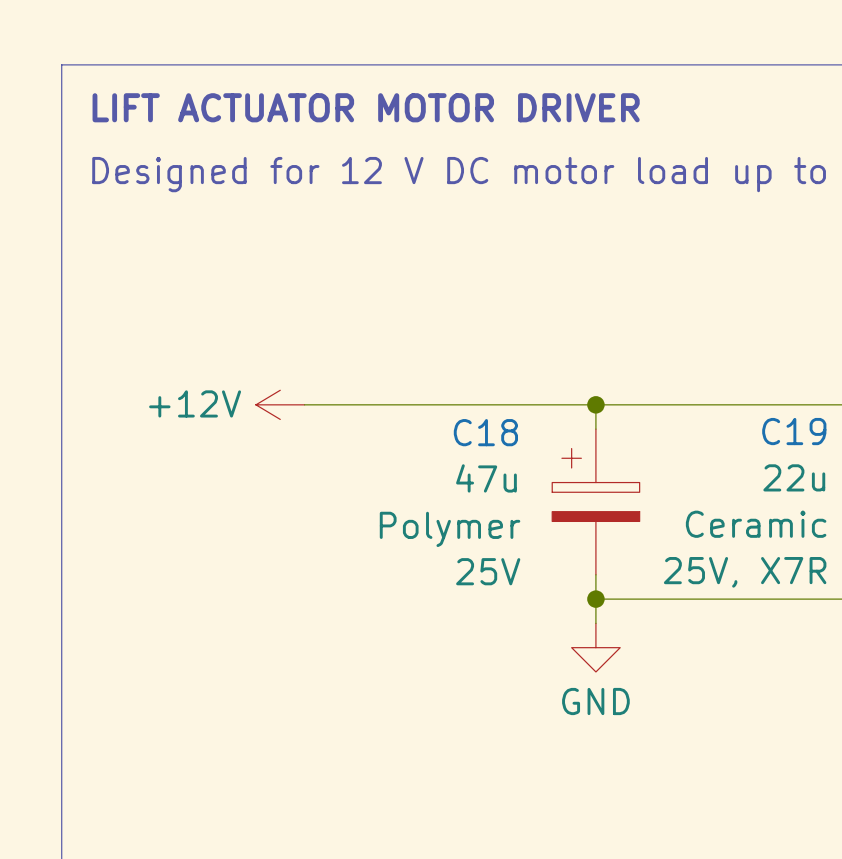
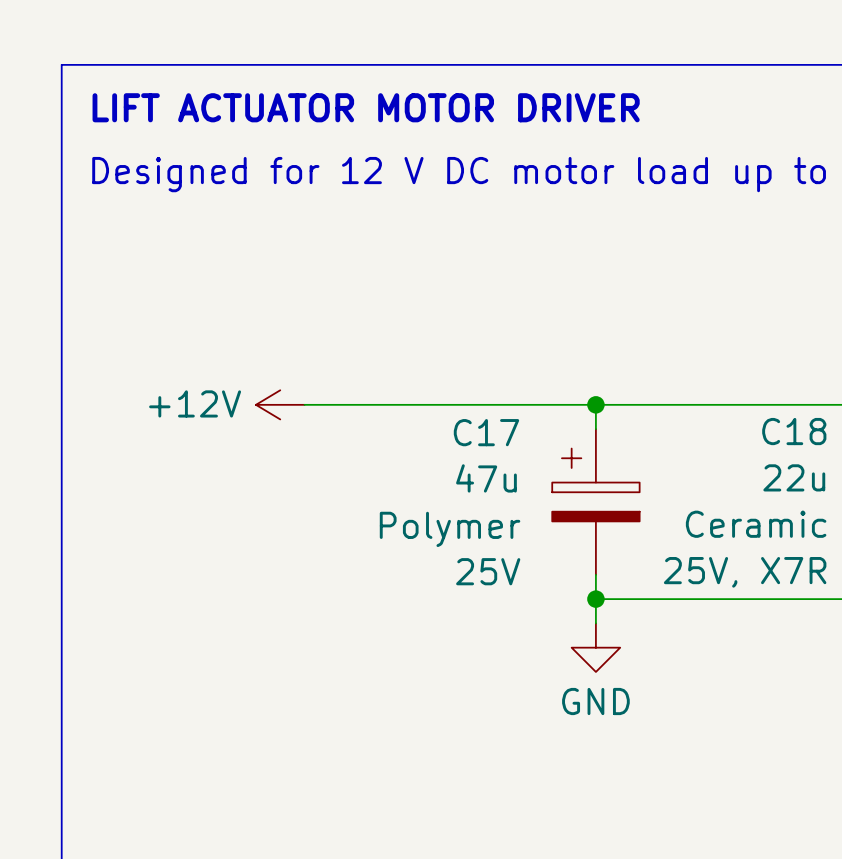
C19 name: C19 (794, 431) -> C18 (794, 431)
C18 name: C18 (485, 432) -> C17 (486, 432)

